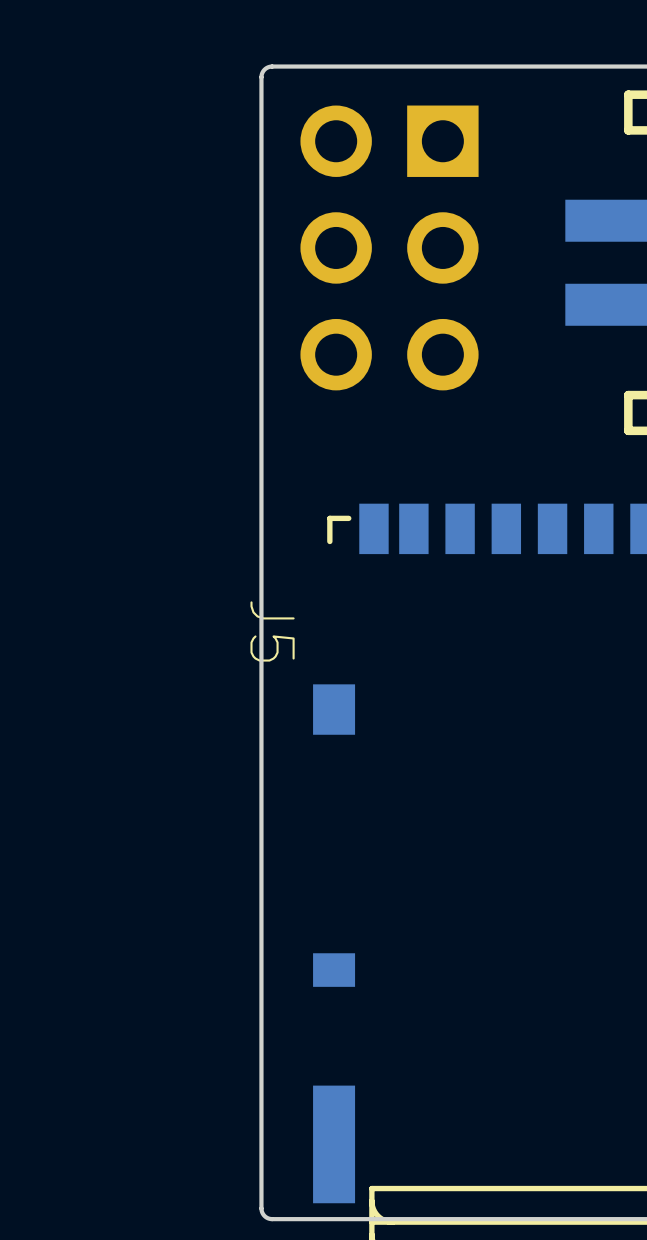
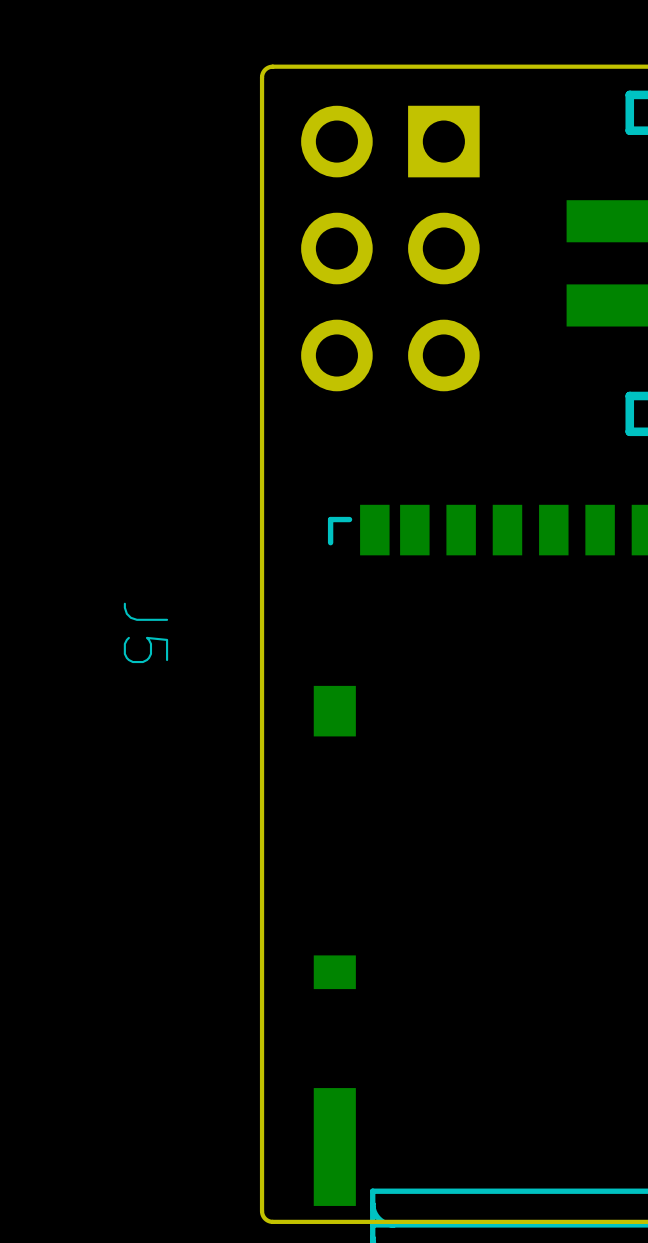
J5 name position: J5 (272, 631) -> J5 (145, 632)

